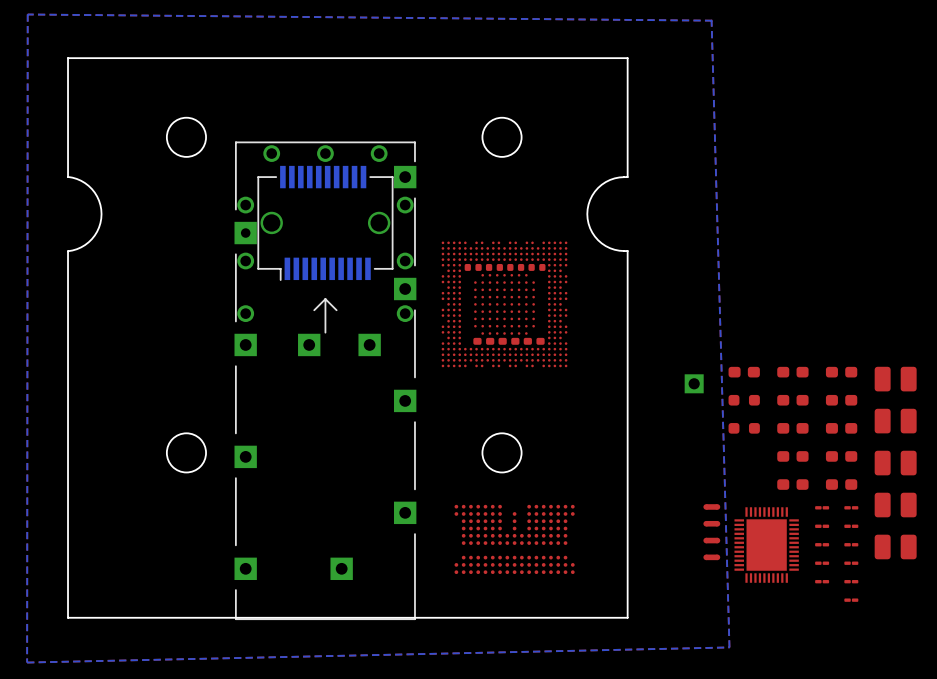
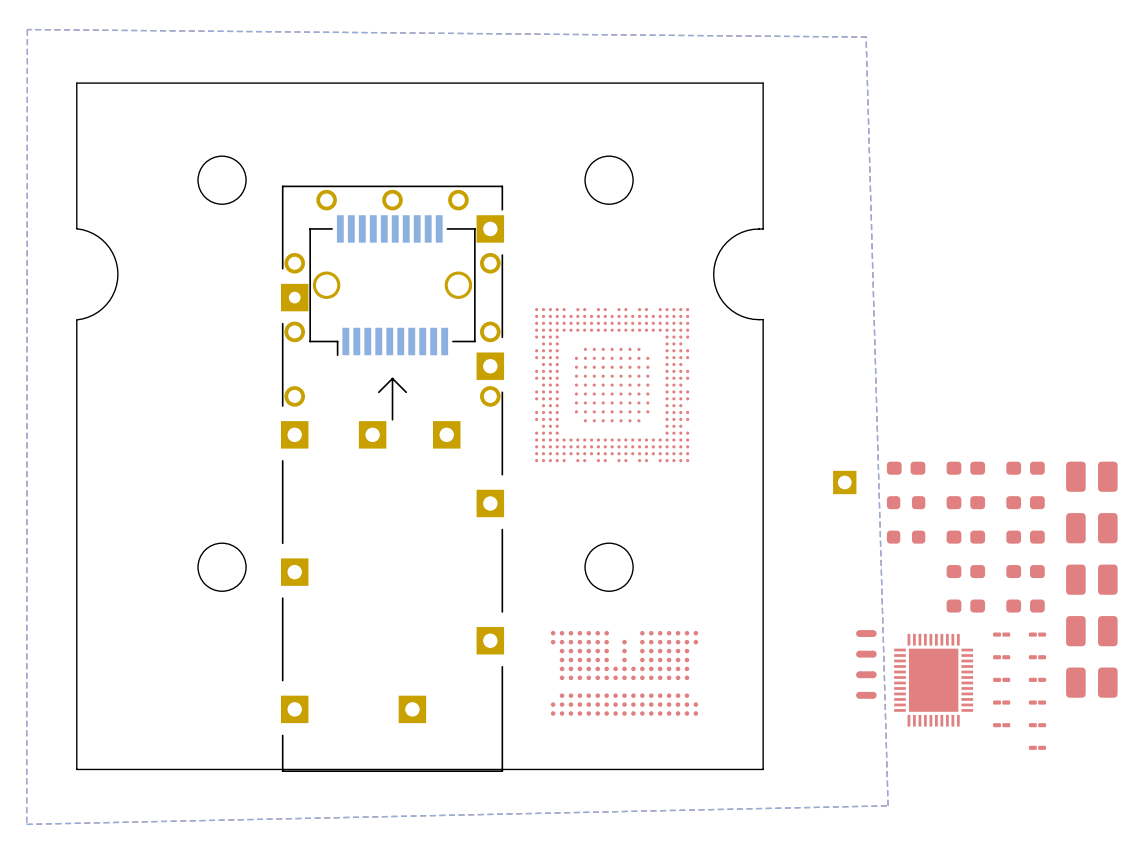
part: (473, 267) -> none
part: (494, 267) -> none
part: (515, 267) -> none
part: (536, 267) -> none
part: (483, 341) -> none
part: (509, 341) -> none
part: (534, 341) -> none

